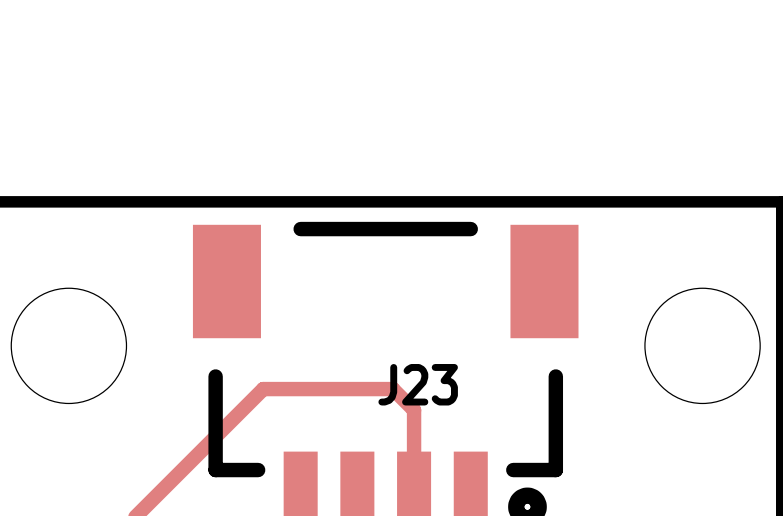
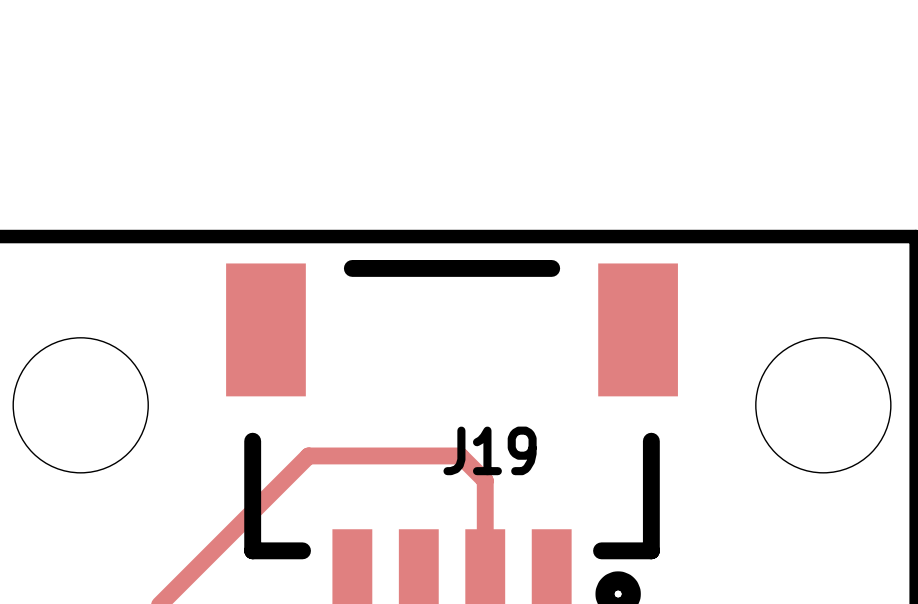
J23 name: J23 (418, 384) -> J19 (490, 450)

